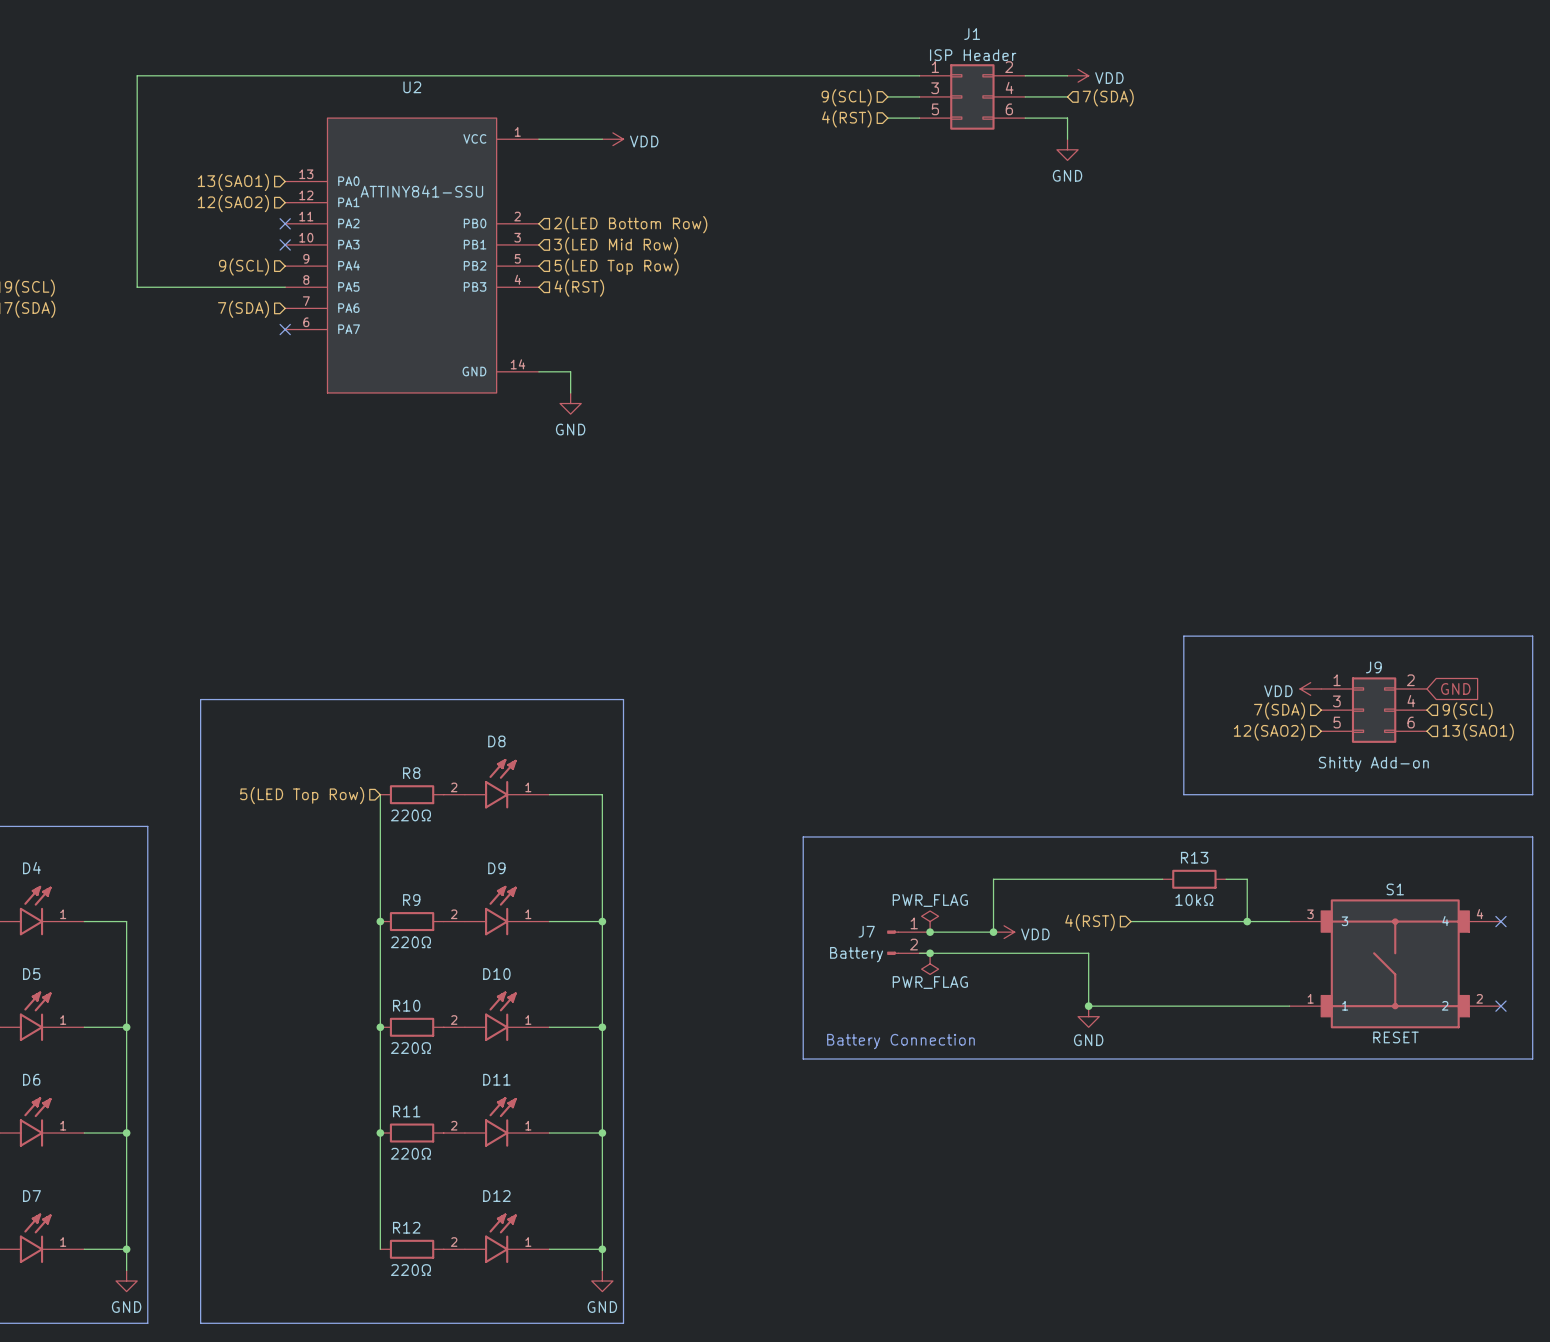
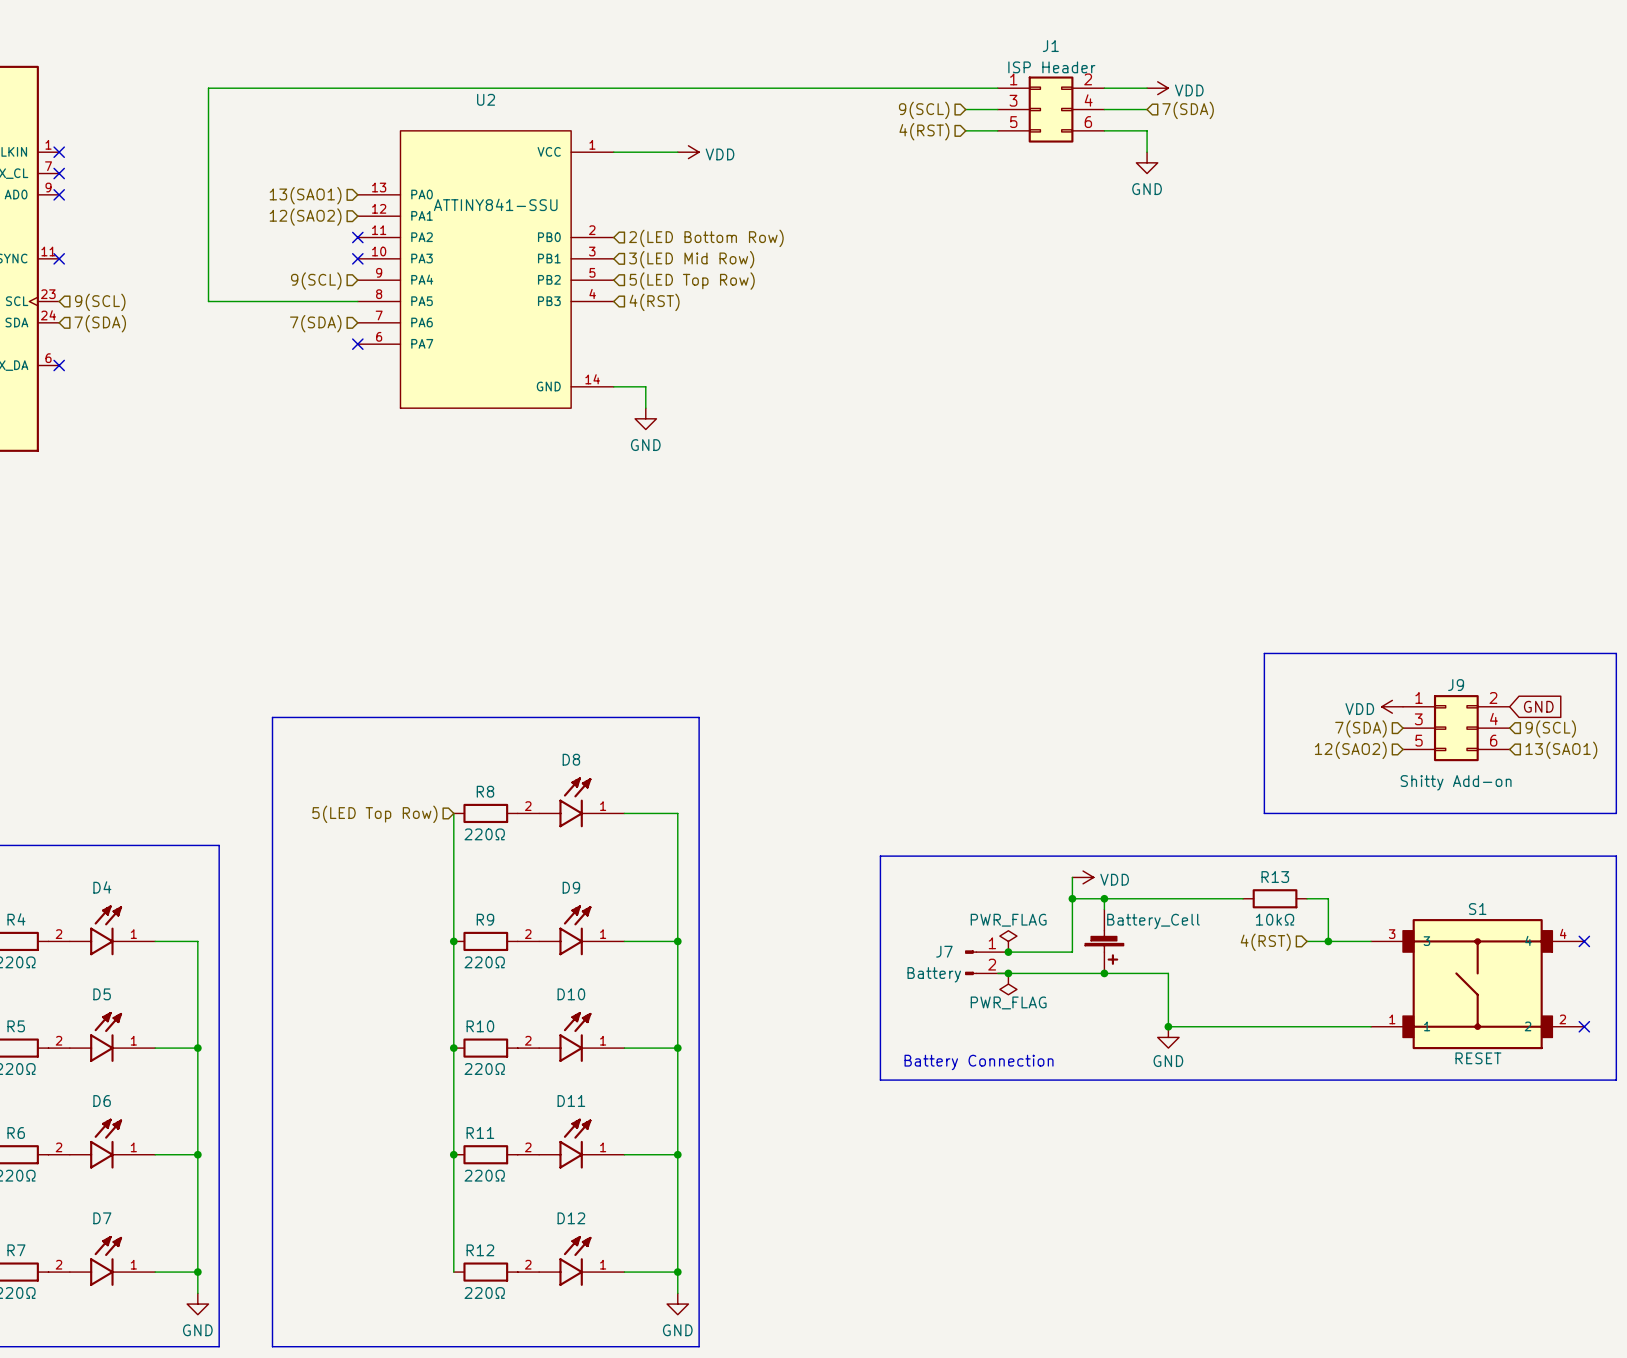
wire: none -> (1072, 877) (1072, 898)
junction: none -> (1072, 898)
wire: none -> (1104, 898) (1104, 909)
junction: none -> (1104, 898)
part: none -> Battery_Cell (1104, 941)
wire: (1130, 921) (1226, 921) -> none
hierarchical label position: 4(RST) (1090, 922) -> 4(RST) (1265, 942)
junction: (993, 932) -> none
power symbol position: VDD (1004, 932) -> VDD (1083, 877)
junction: none -> (1104, 973)

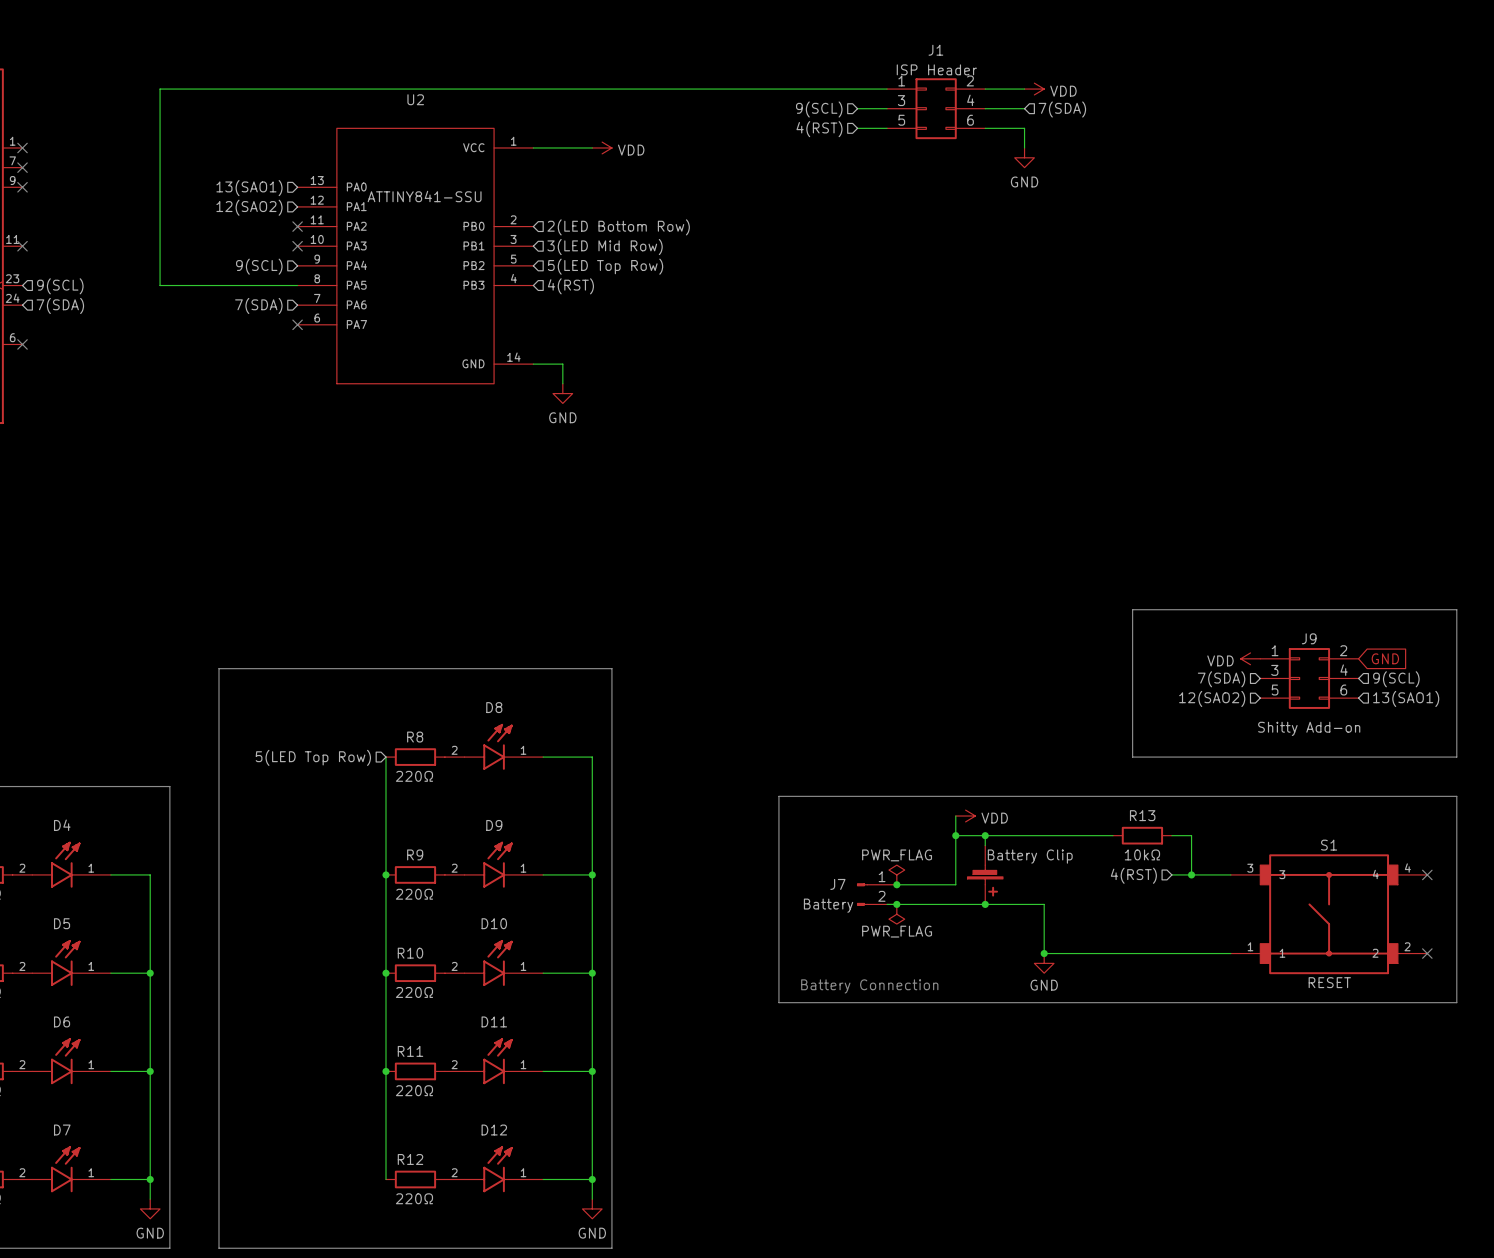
part value: Battery_Cell (1153, 921) -> Battery Clip (1030, 856)

